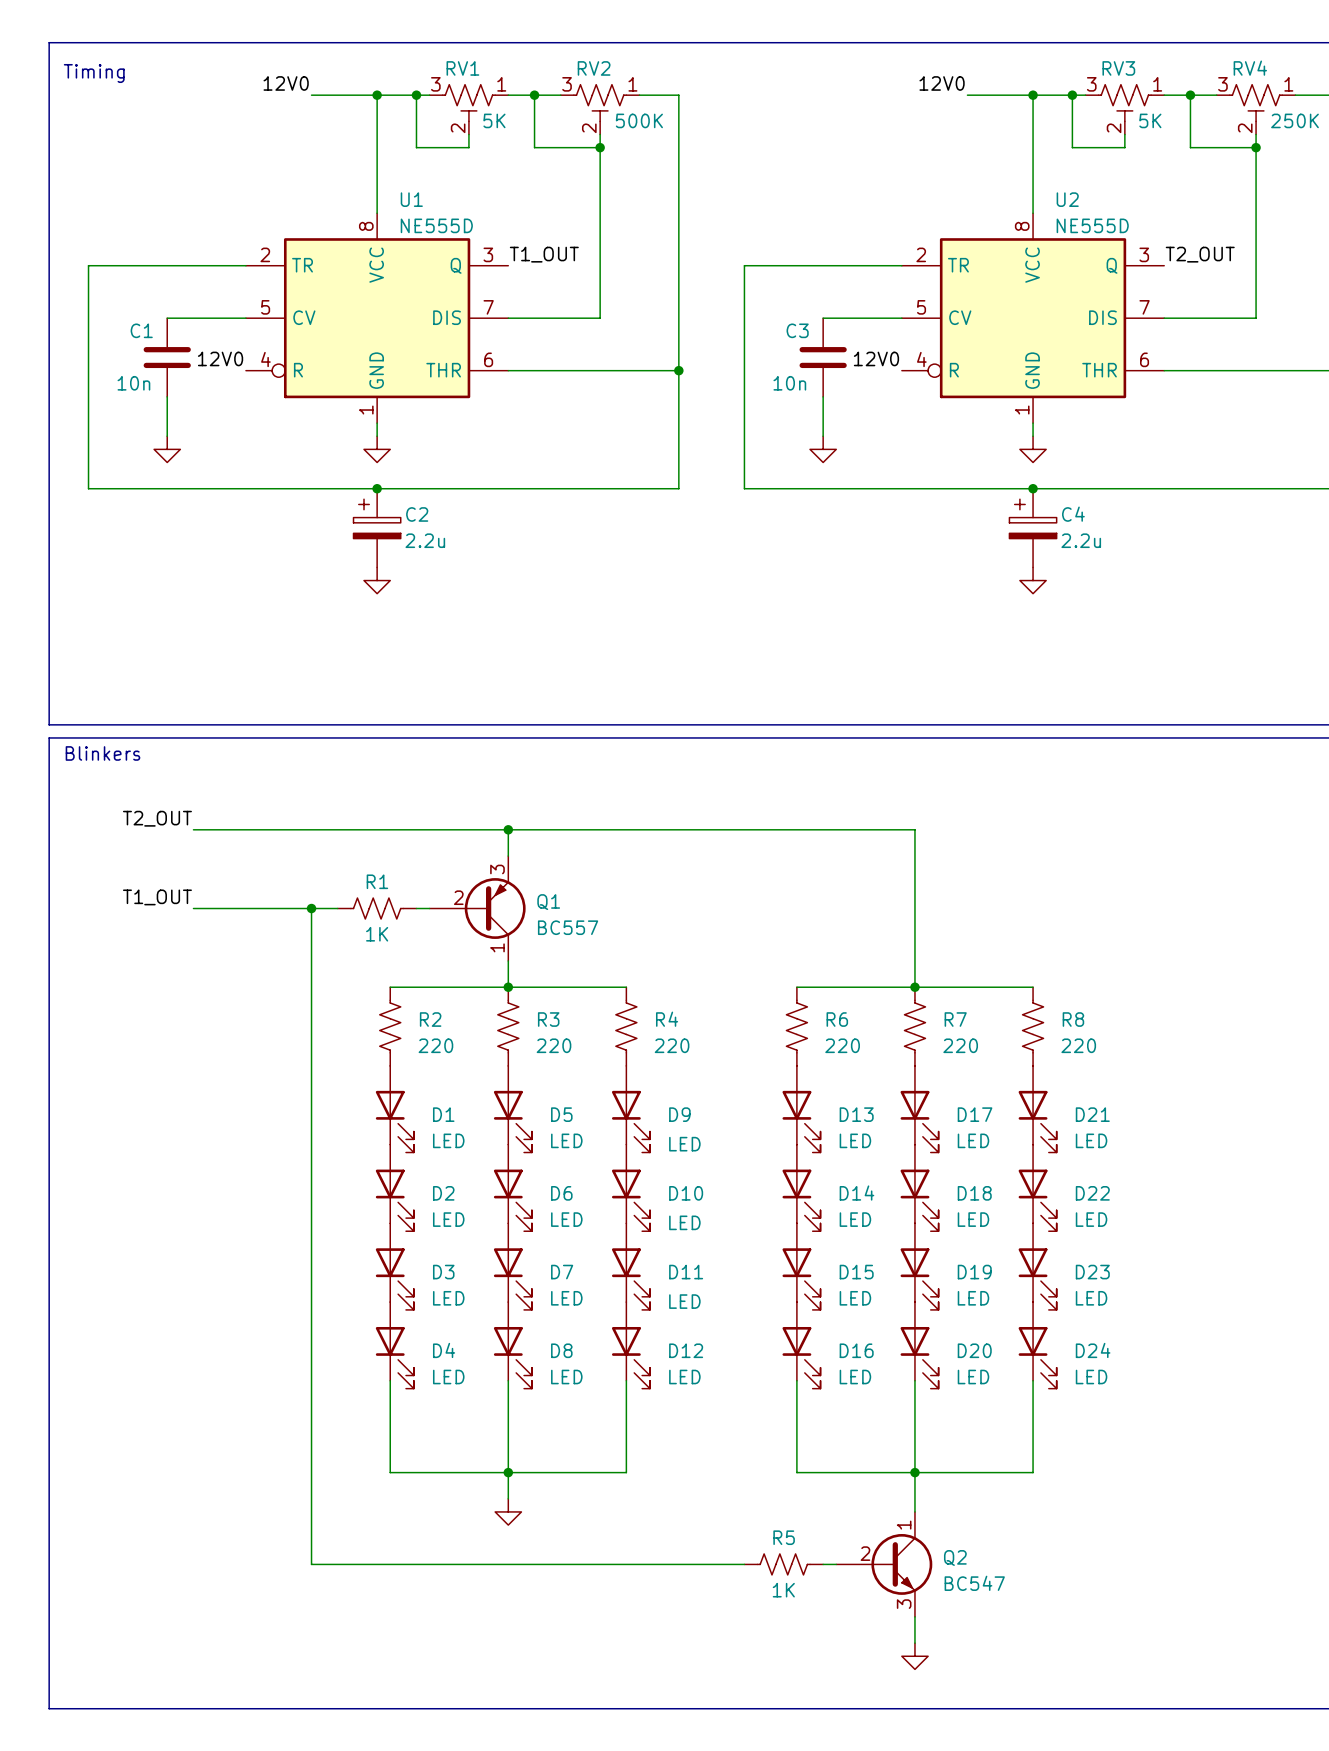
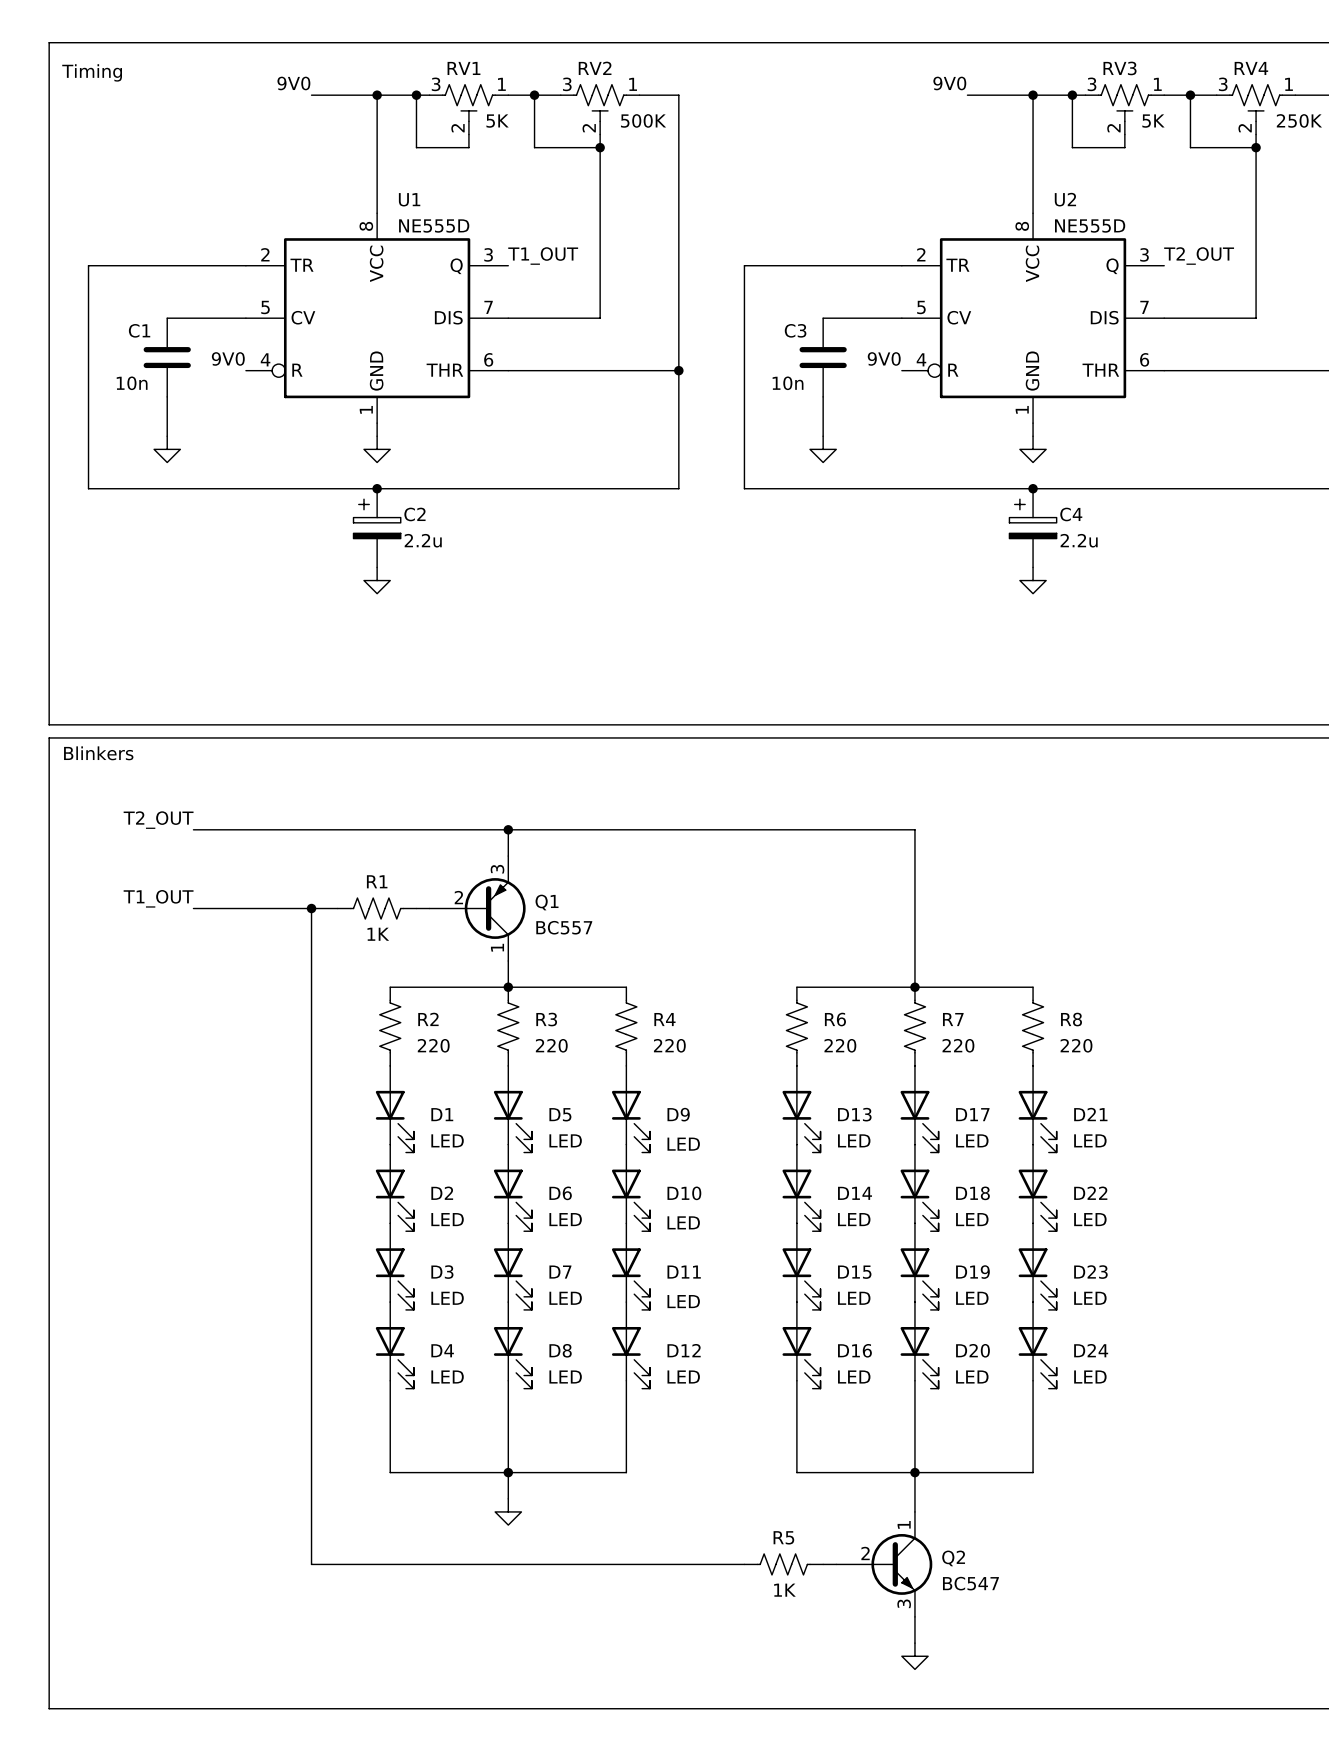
label: 12V0 (286, 83) -> 9V0 (293, 83)
label: 12V0 (942, 83) -> 9V0 (949, 83)
label: 12V0 (220, 358) -> 9V0 (228, 358)
label: 12V0 (876, 358) -> 9V0 (884, 358)

